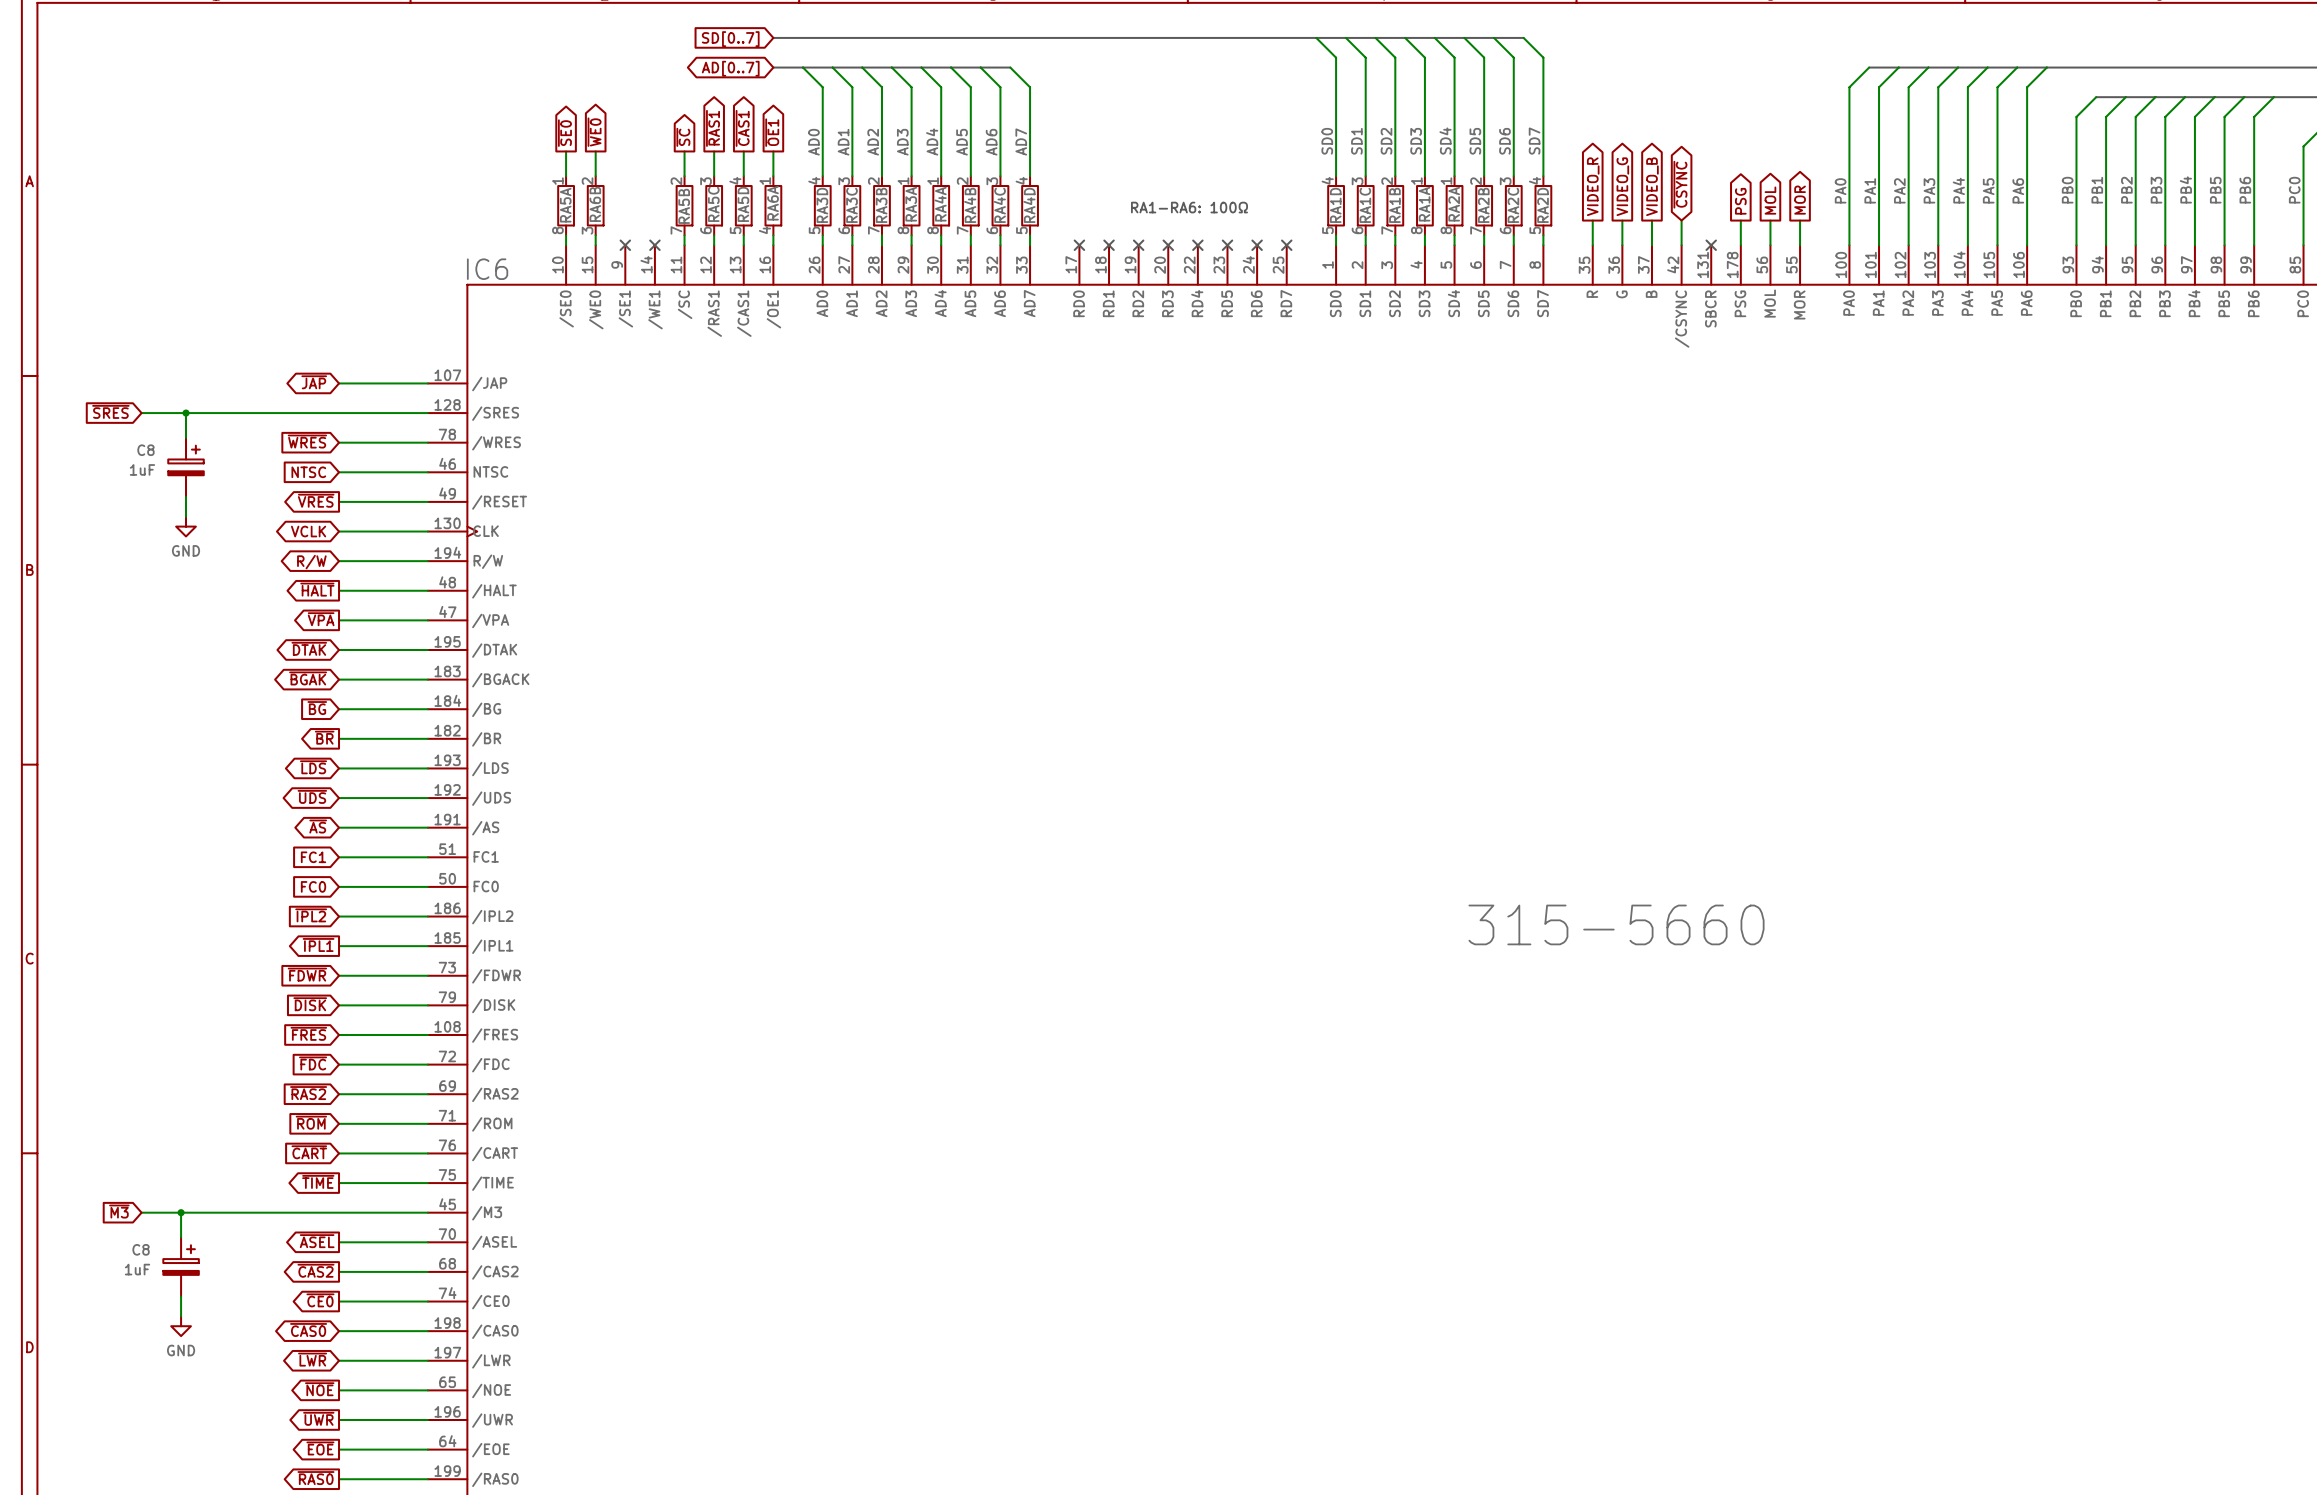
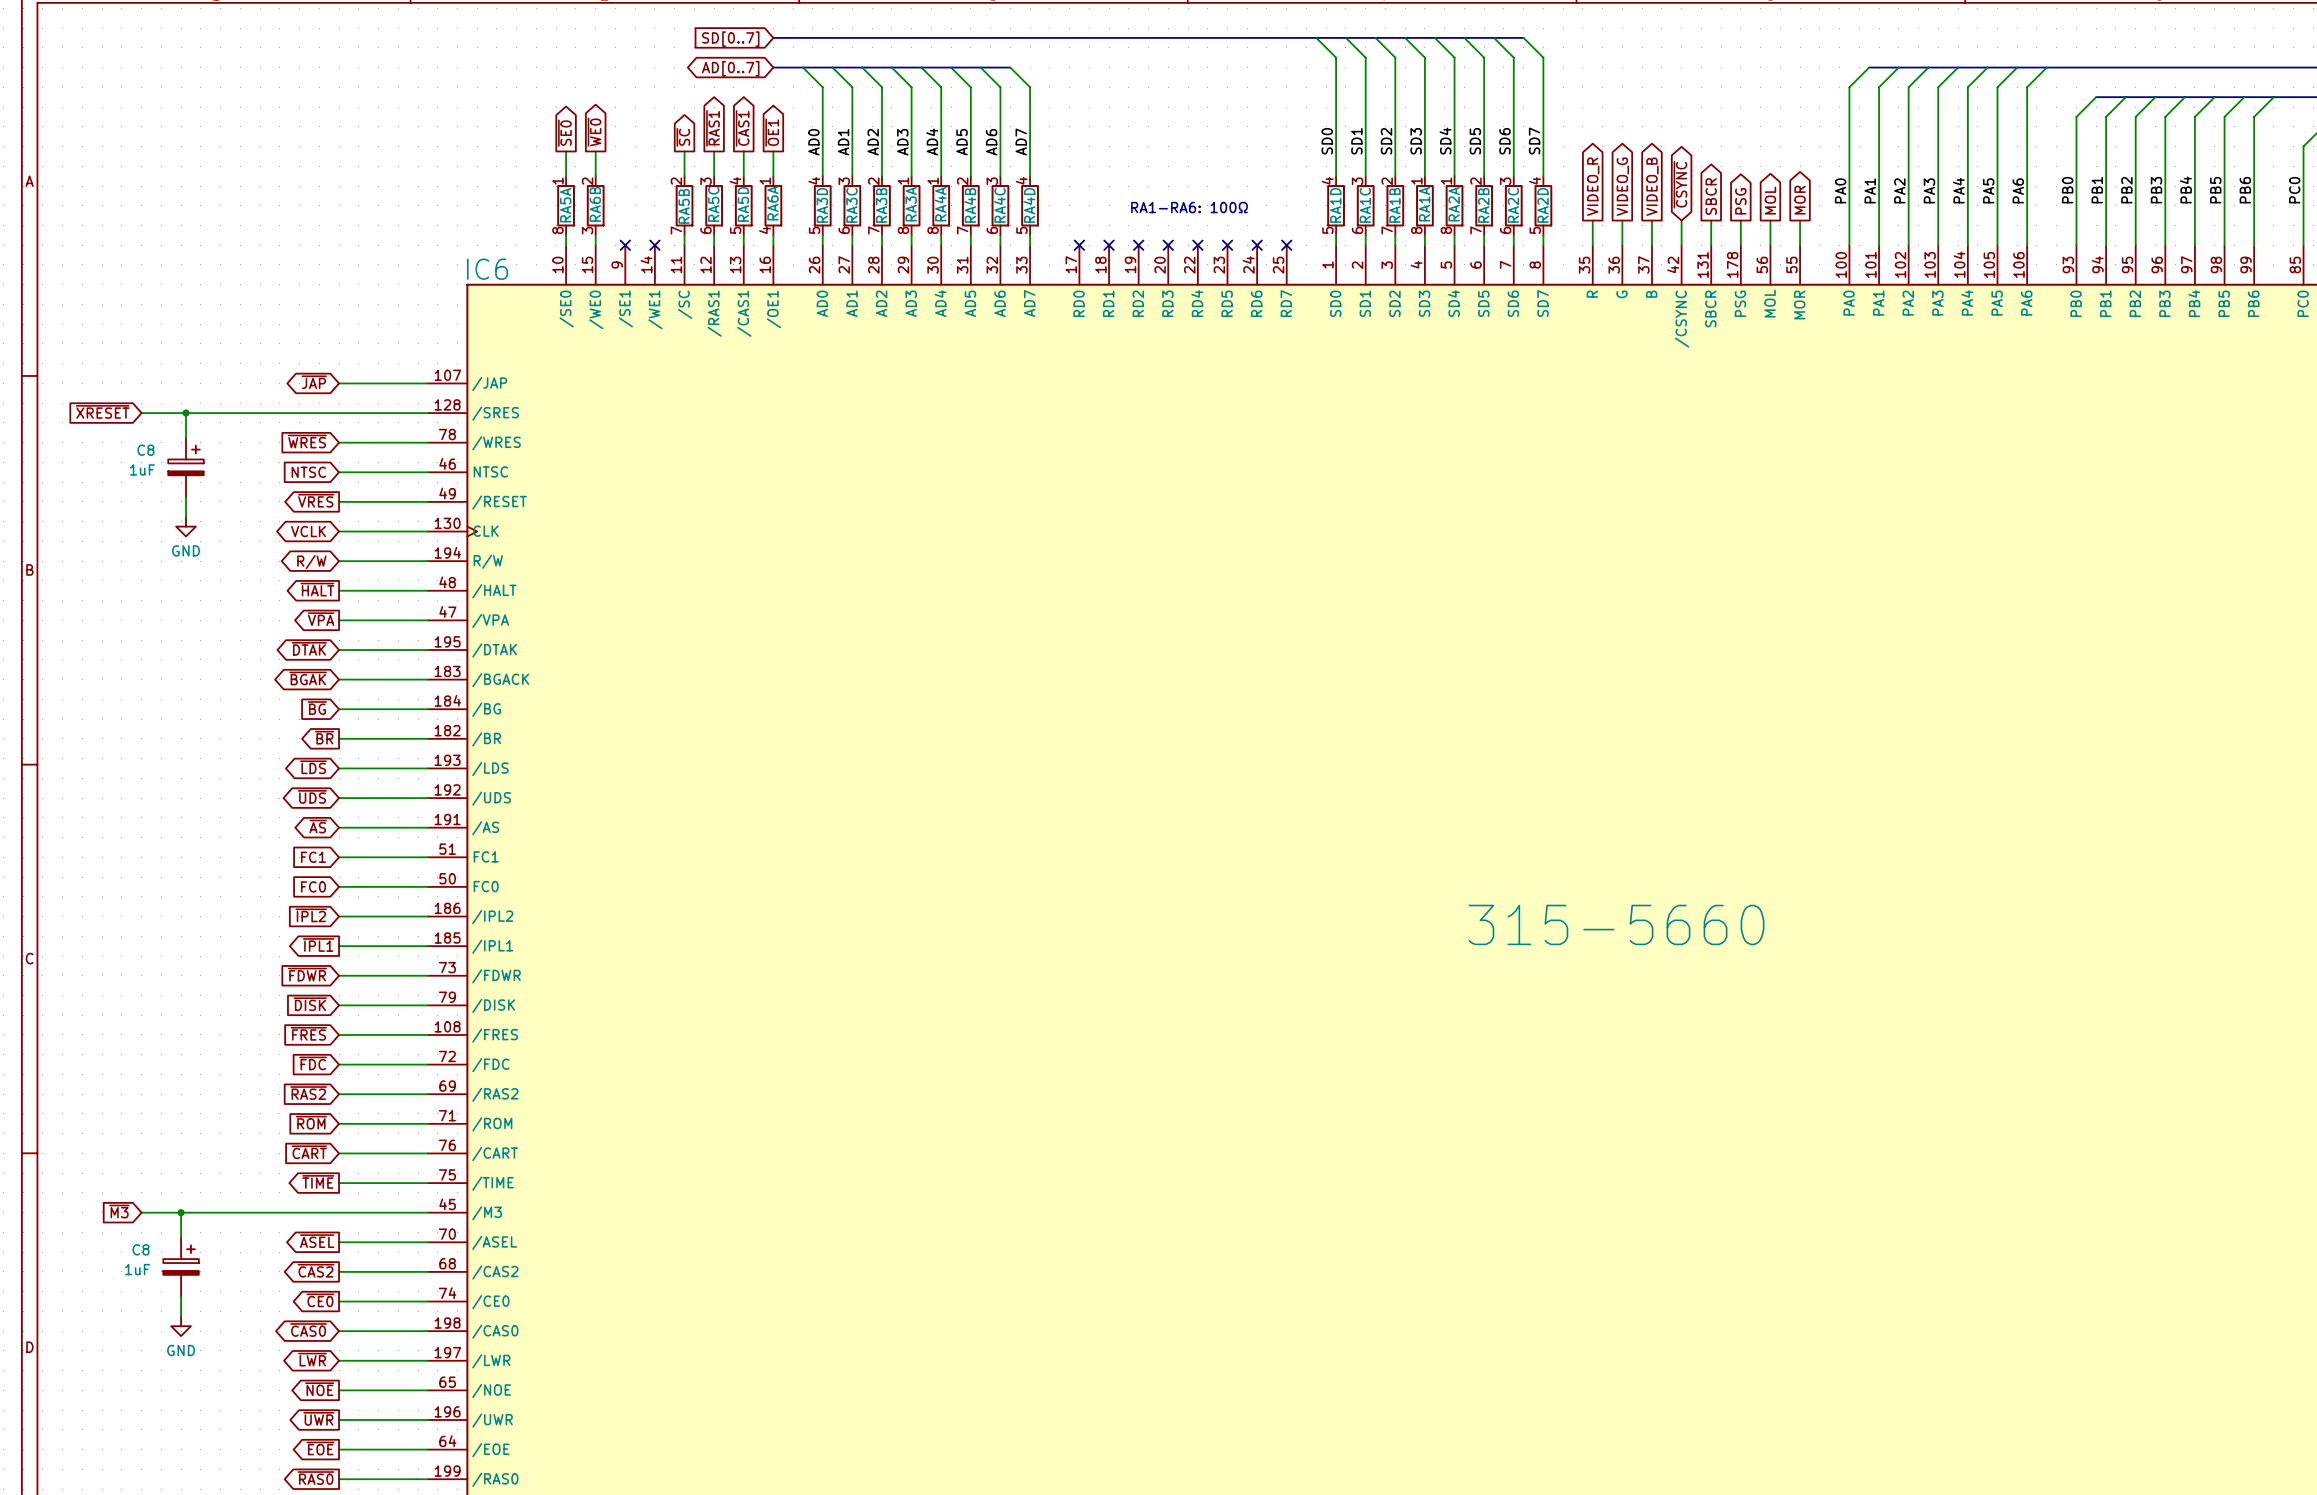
global label: none -> SBCR (1711, 196)
wire: none -> (1711, 220) (1711, 245)
no-connect mark: (1711, 245) -> none
global label: ~{SRES} (110, 411) -> ~{XRESET} (102, 411)

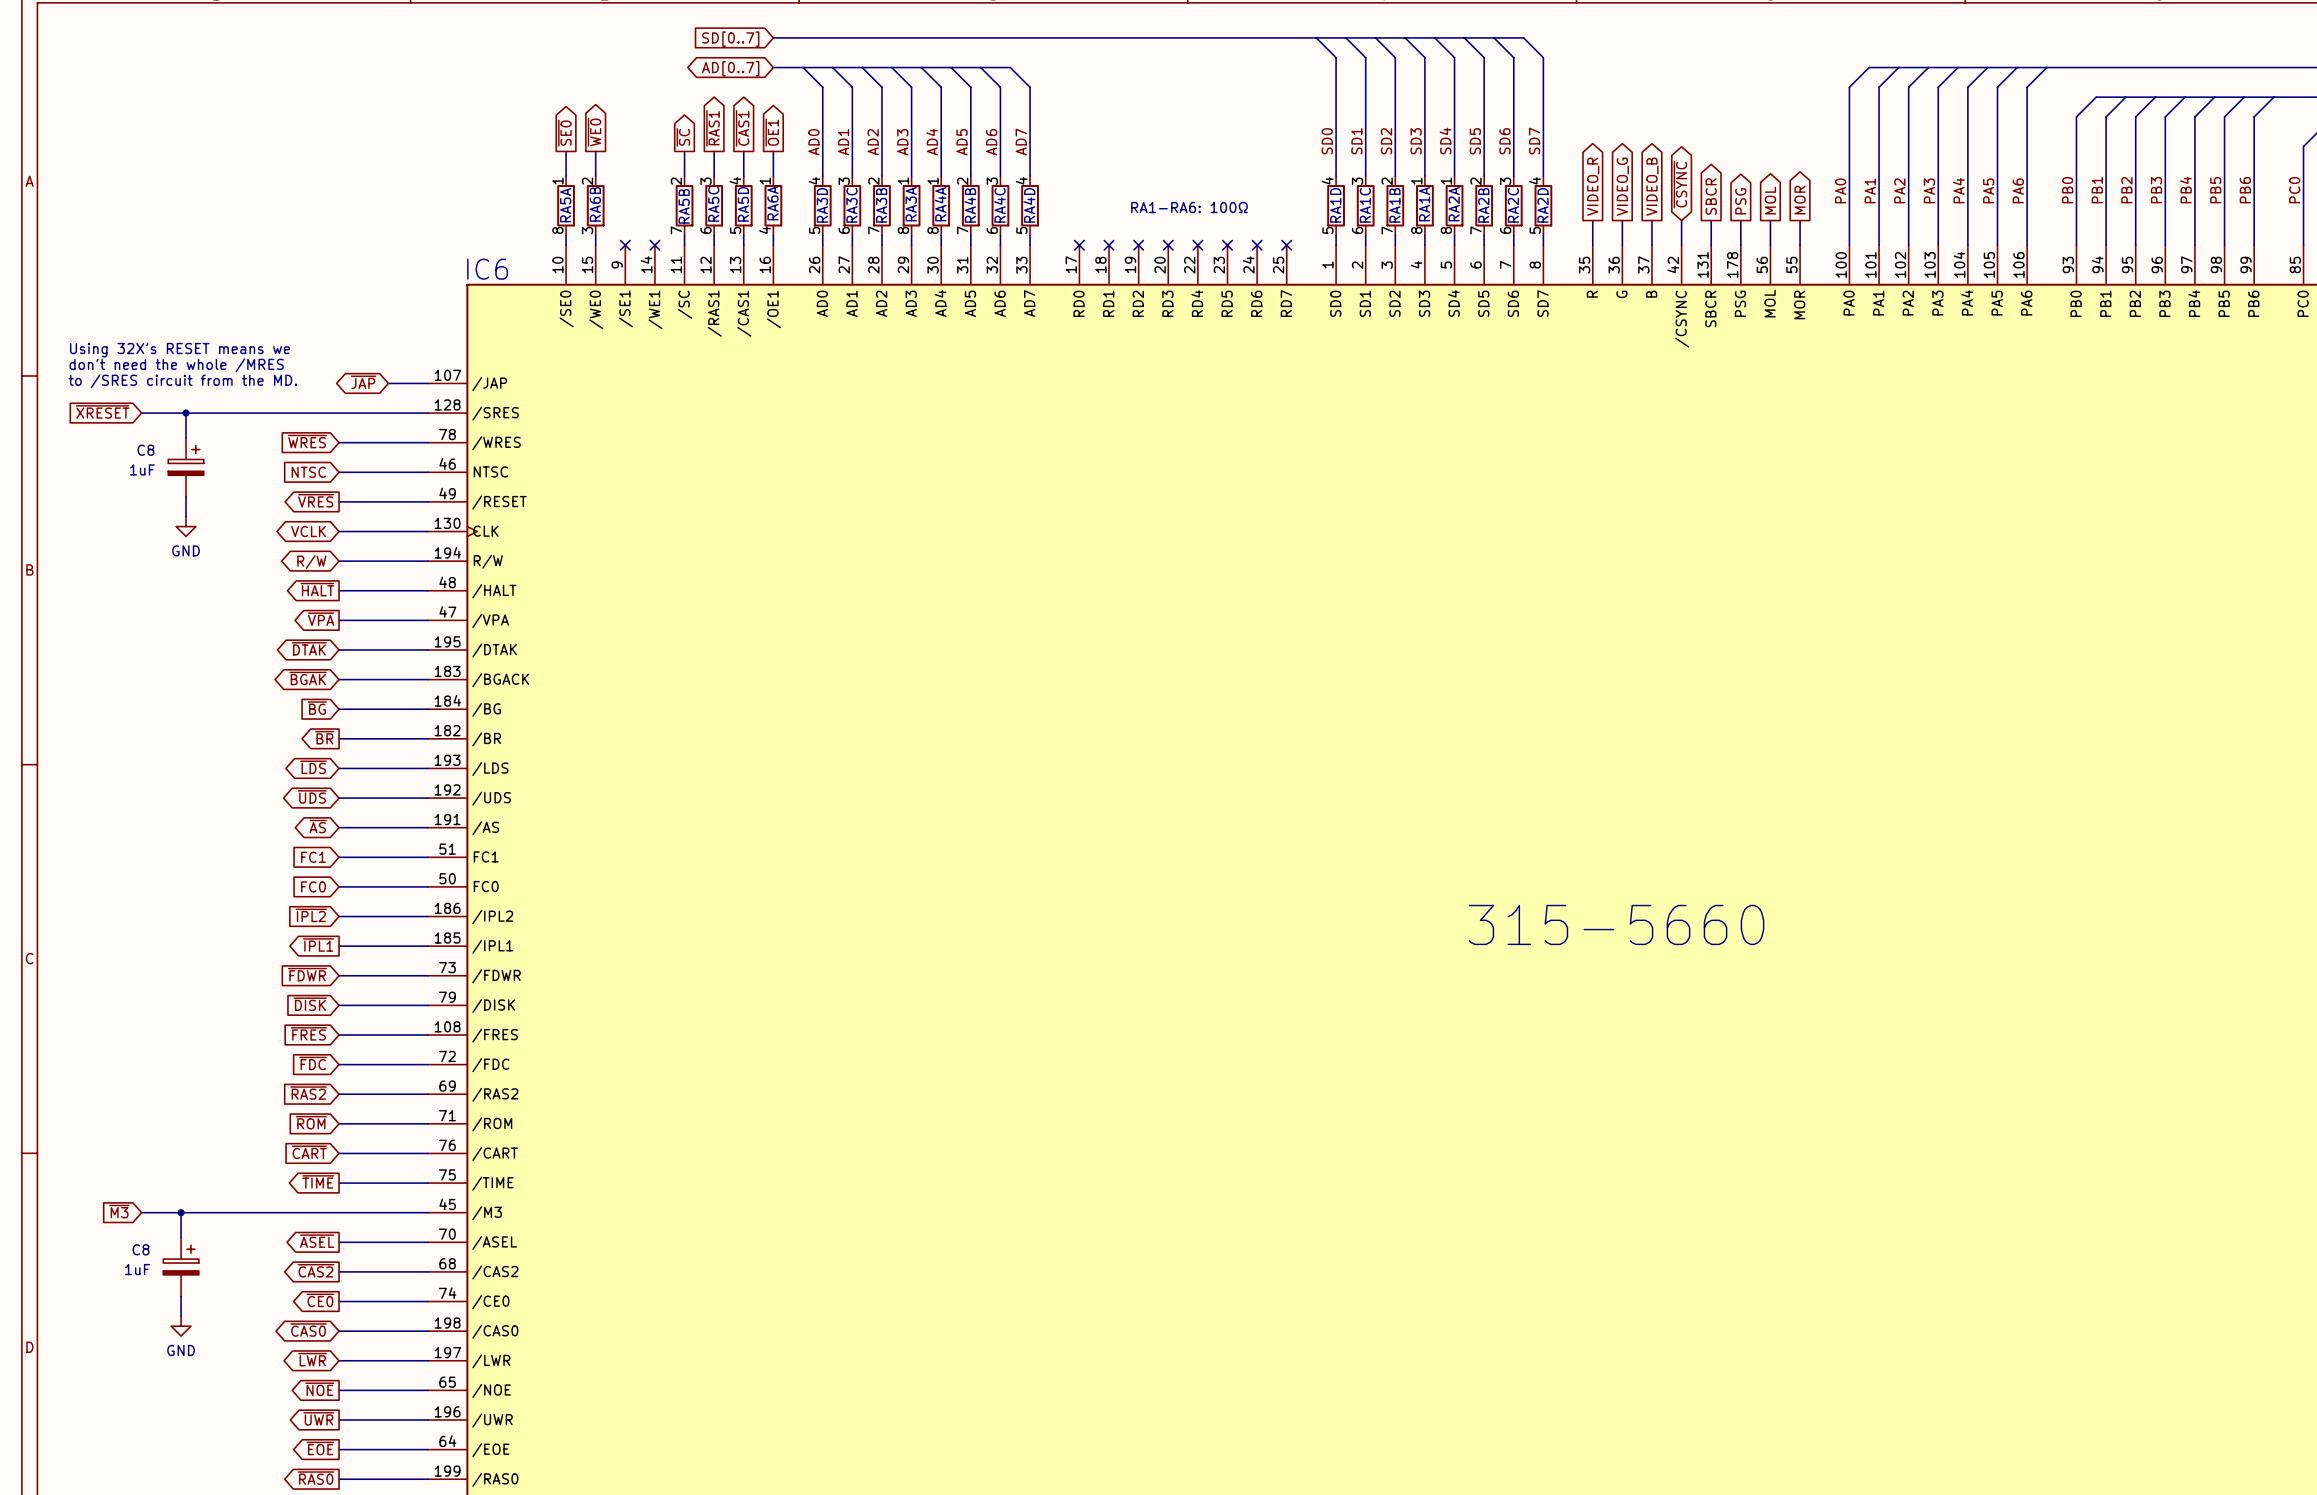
text: none -> Using 32X's RESET means we (179, 350)
text: none -> don't need the whole /MRES (176, 365)
text: none -> to /SRES circuit from the MD. (182, 381)
global label position: ~{JAP} (314, 382) -> ~{JAP} (363, 382)
wire: (339, 383) (388, 383) -> none

